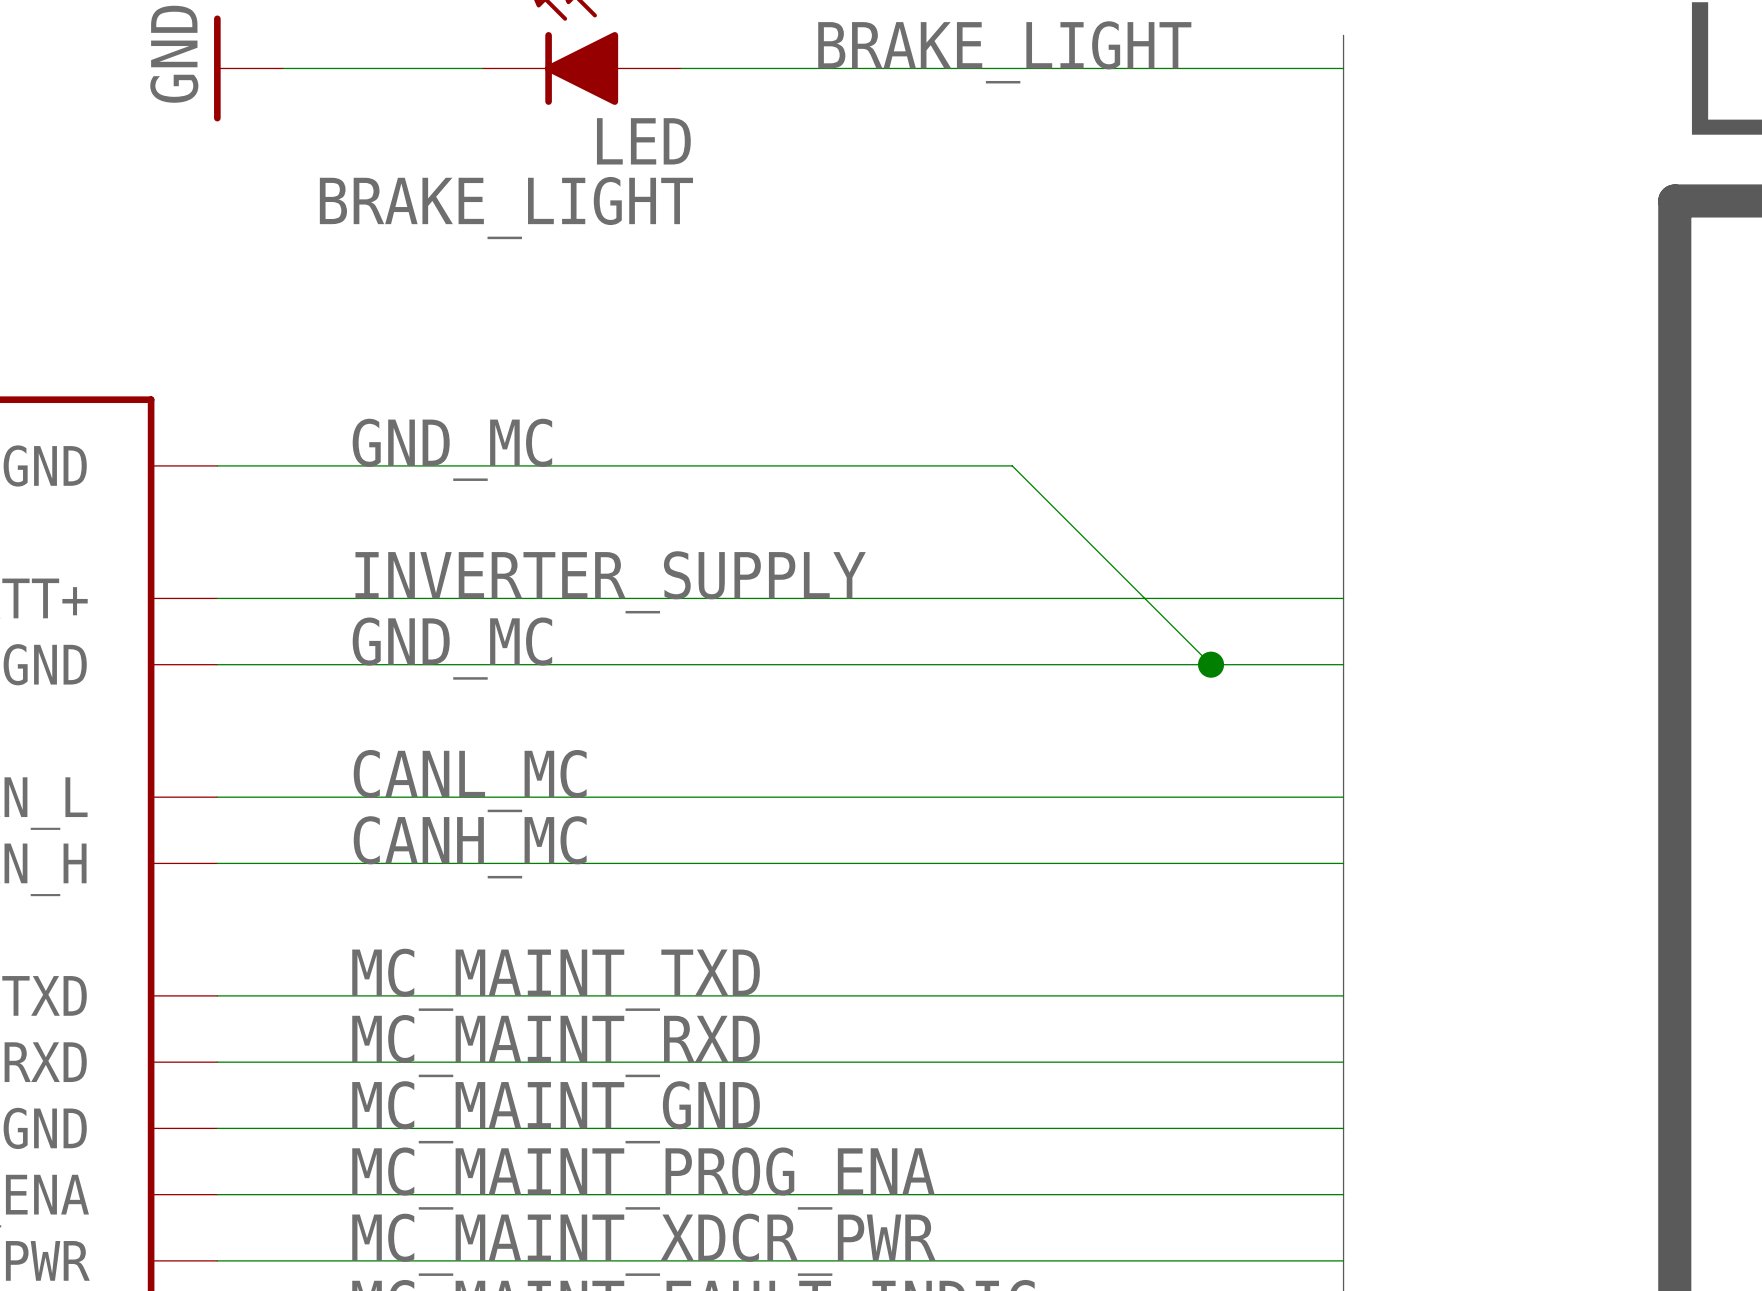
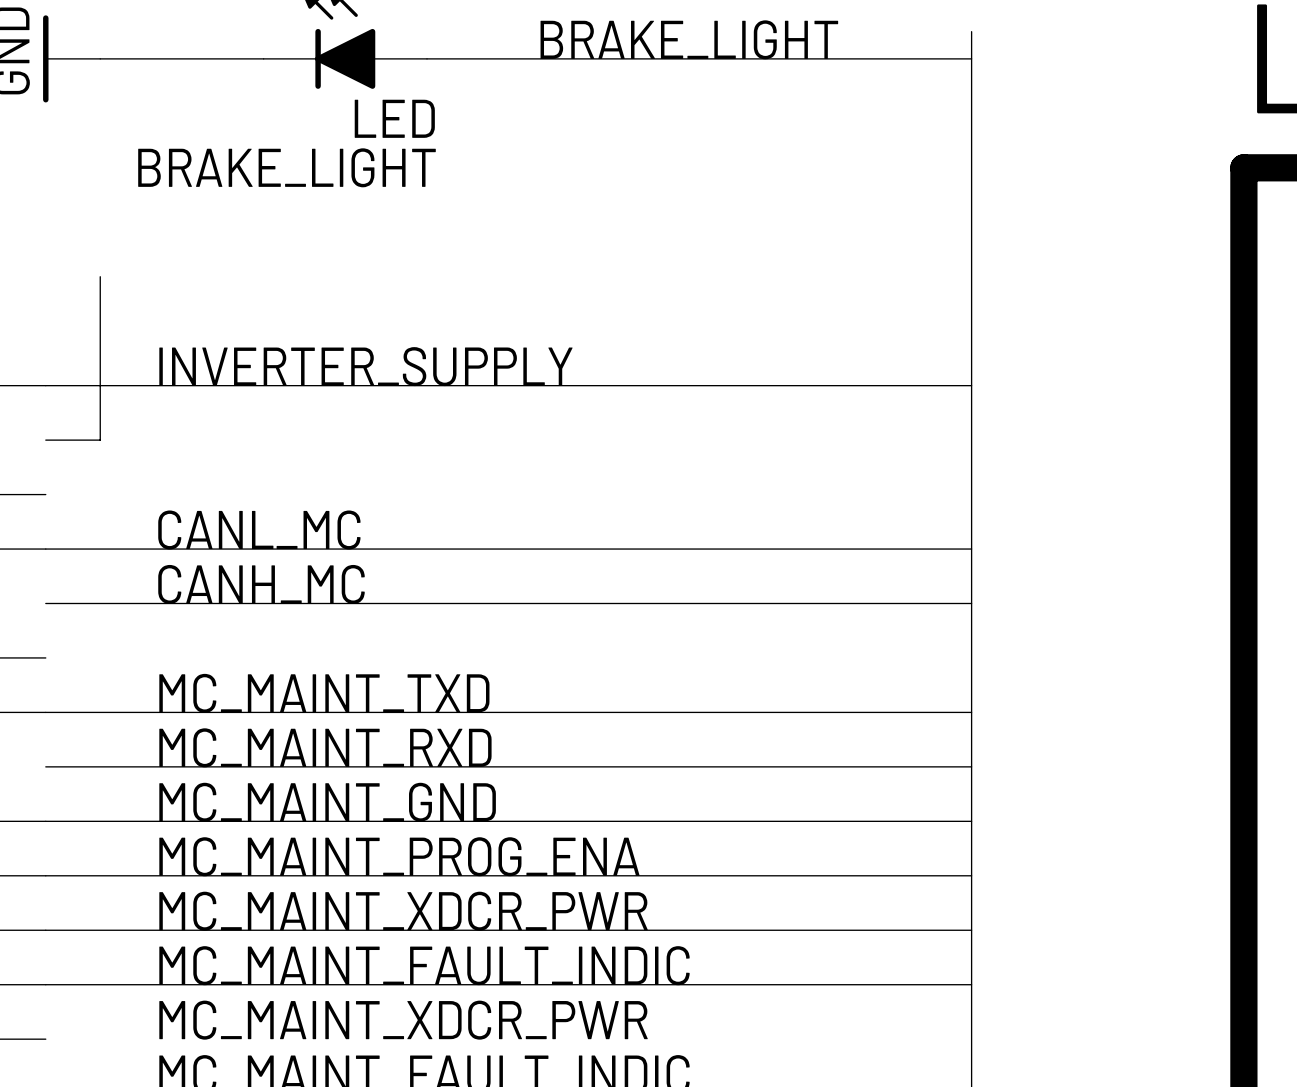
wire: none -> (100, 276) (100, 440) (45, 440)
label: GND_MC (452, 449) -> INVERTER_SUPPLY (365, 366)
wire: (1012, 465) (1211, 664) -> (699, 385) (971, 385)
label: INVERTER_SUPPLY (610, 582) -> none
wire: (217, 598) (1343, 598) -> (45, 603) (971, 603)
label: GND_MC (452, 648) -> CANL_MC (259, 530)
junction: (1211, 664) -> none
label: CANL_MC (470, 781) -> CANH_MC (261, 584)
wire: (217, 797) (1343, 797) -> (45, 766) (971, 766)
label: CANH_MC (470, 847) -> MC_MAINT_TXD (324, 693)
label: none -> MC_MAINT_RXD (325, 747)
label: MC_MAINT_TXD (556, 979) -> MC_MAINT_GND (327, 802)
label: MC_MAINT_RXD (556, 1046) -> MC_MAINT_PROG_ENA (399, 856)
label: MC_MAINT_GND (556, 1112) -> MC_MAINT_XDCR_PWR (403, 911)
label: MC_MAINT_PROG_ENA (643, 1178) -> MC_MAINT_FAULT_INDIC (424, 965)
wire: (217, 1260) (1343, 1260) -> none

